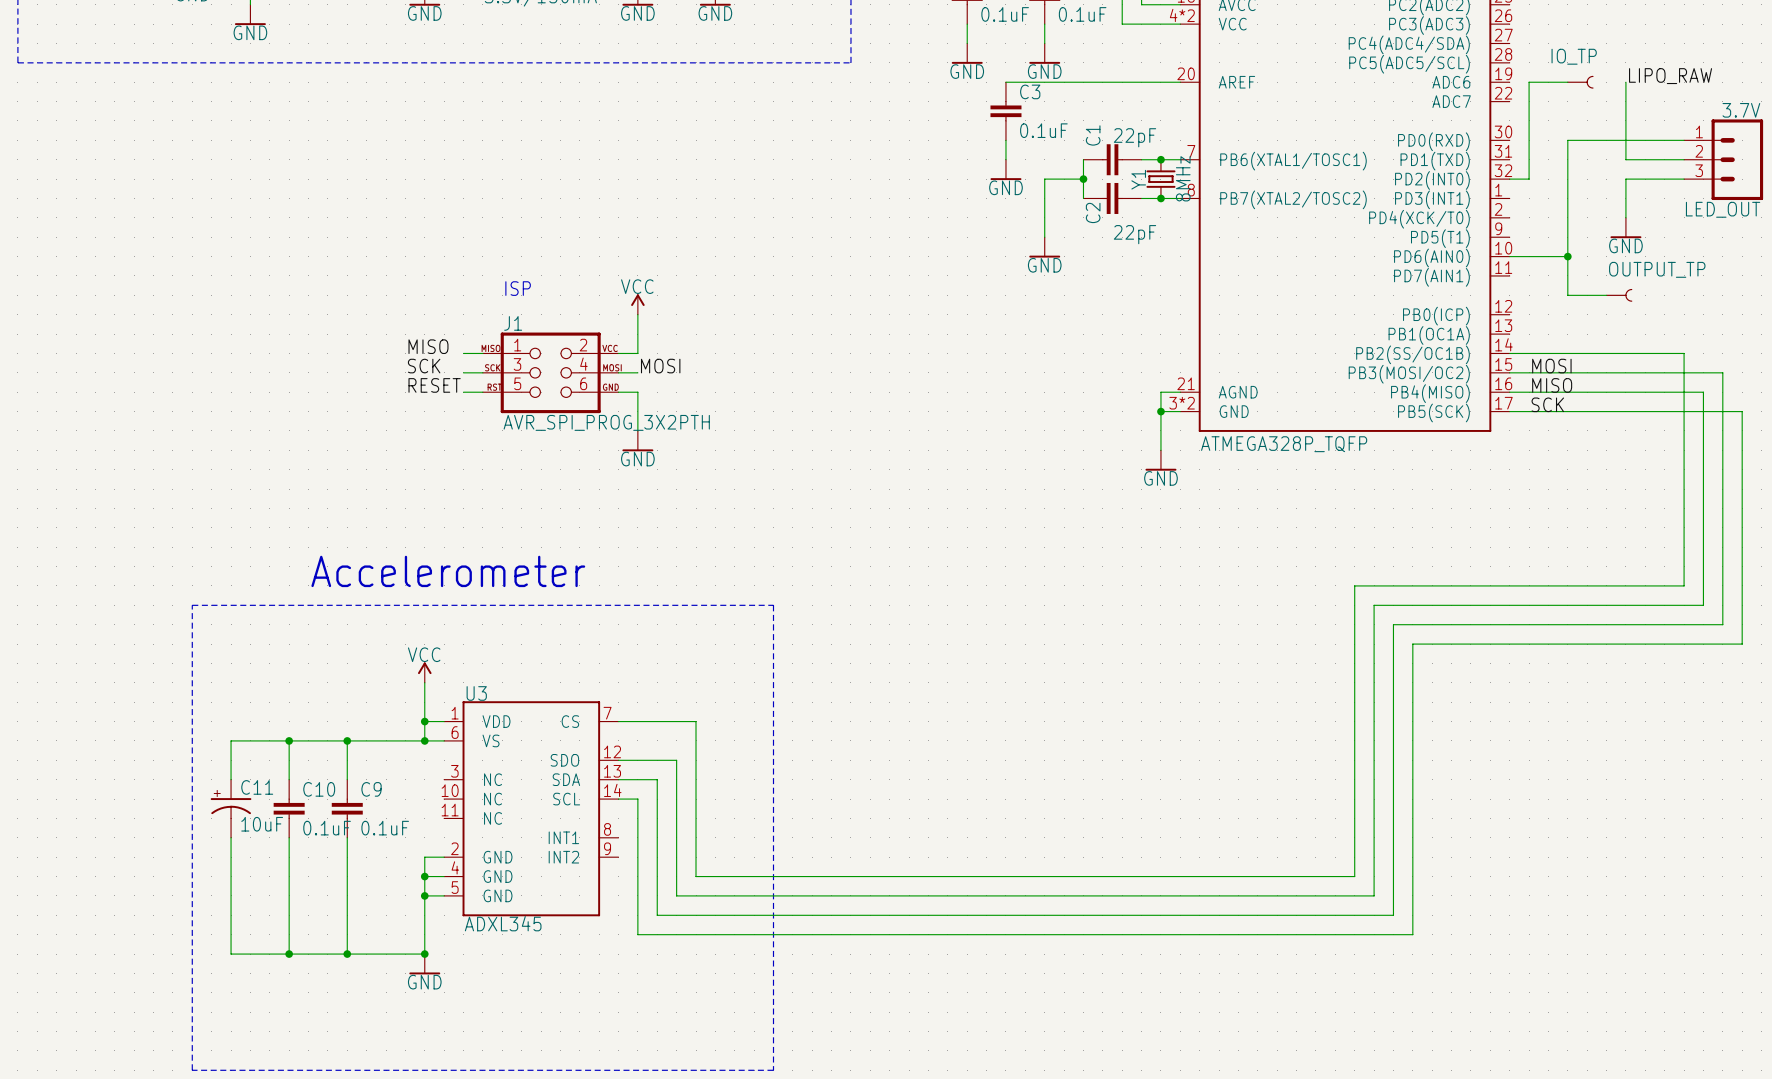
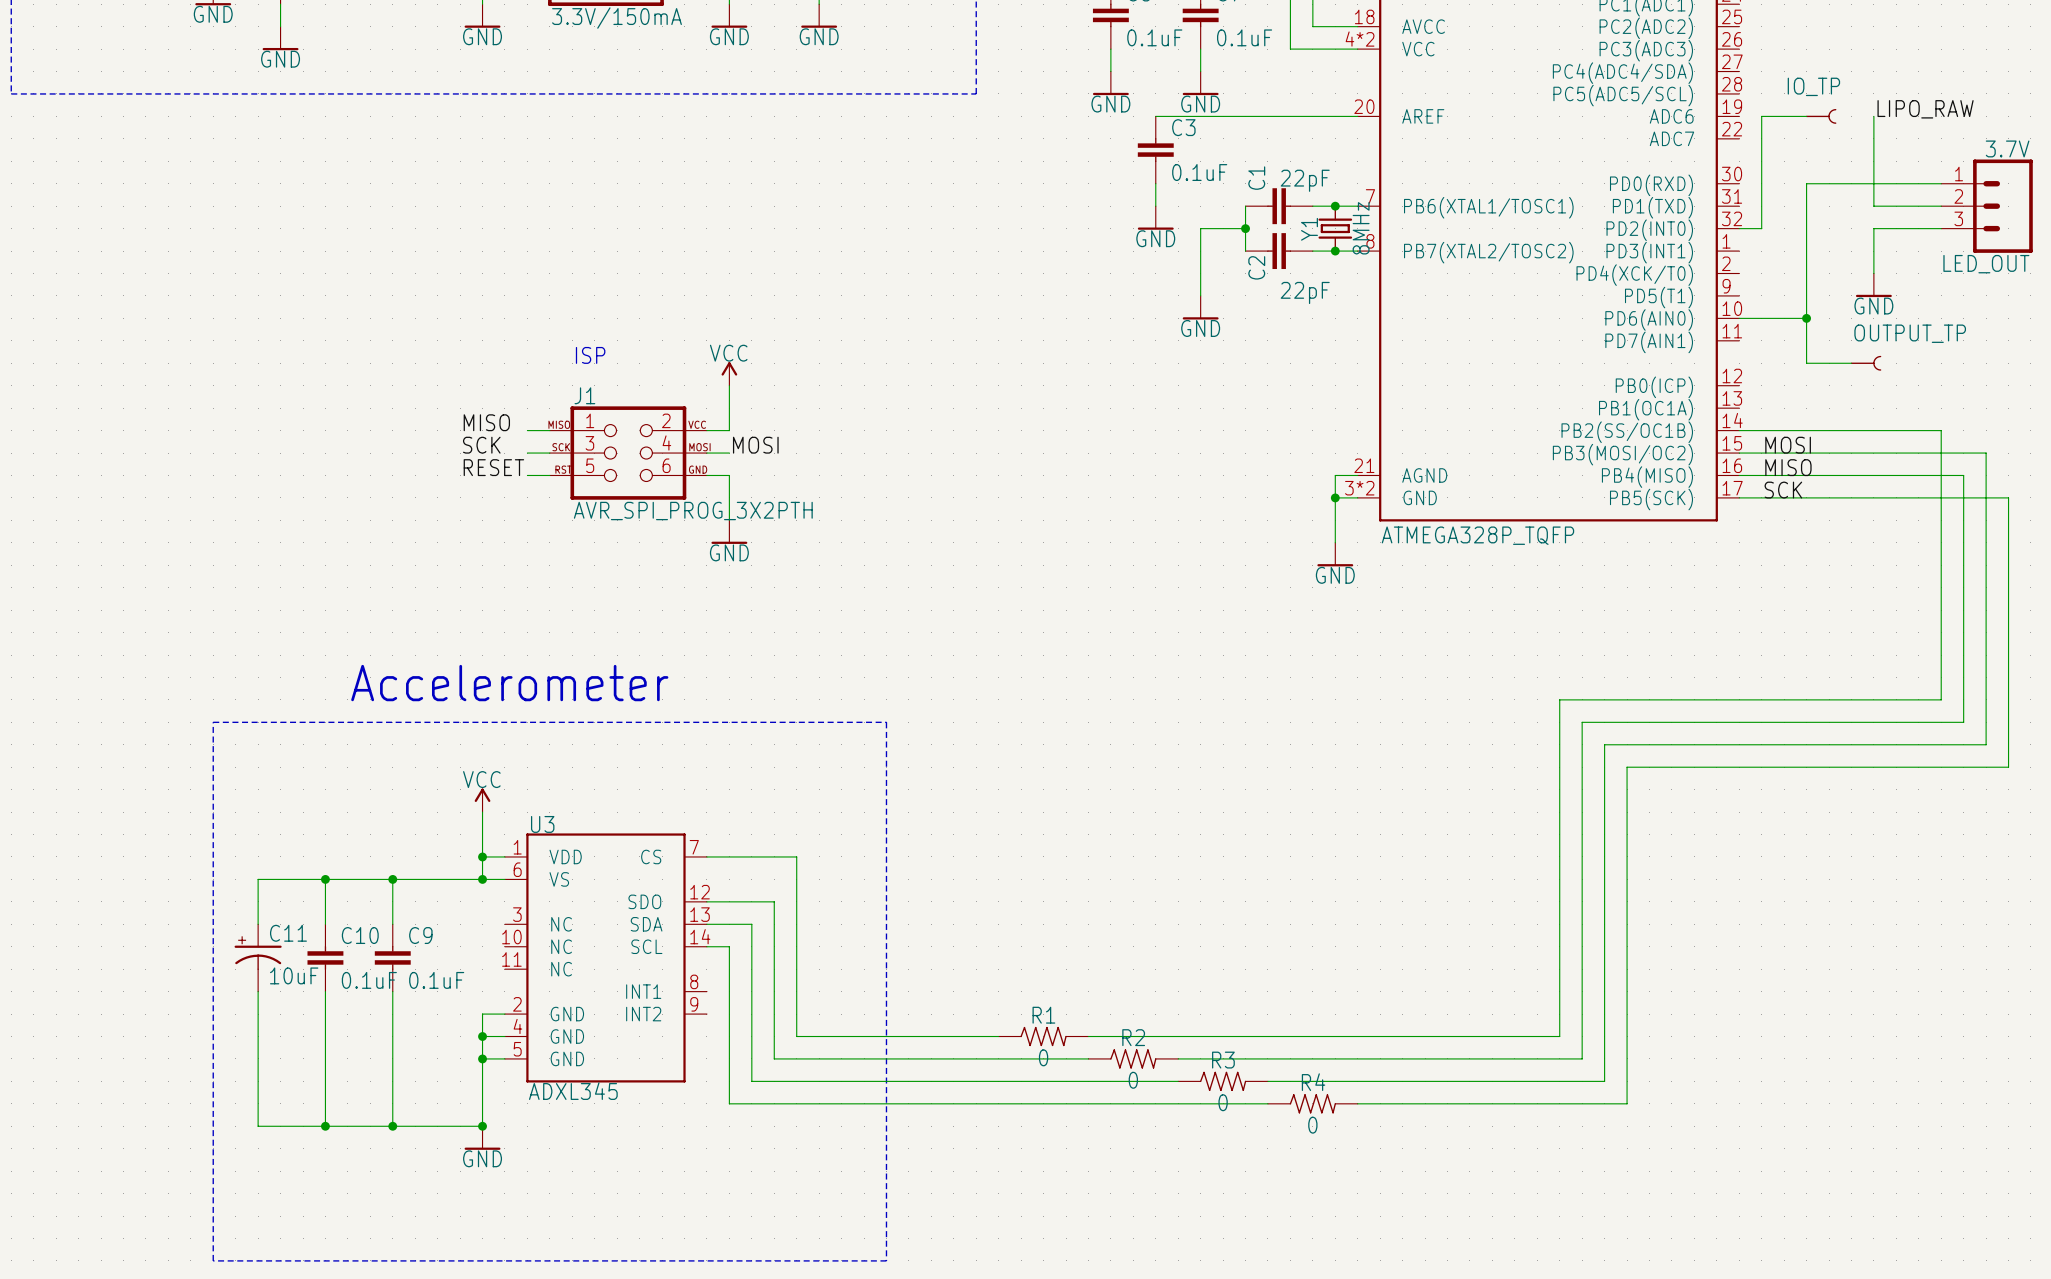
R1: none -> 0 (1043, 1036)
R2: none -> 0 (1133, 1058)
R3: none -> 0 (1223, 1081)
R4: none -> 0 (1312, 1103)

